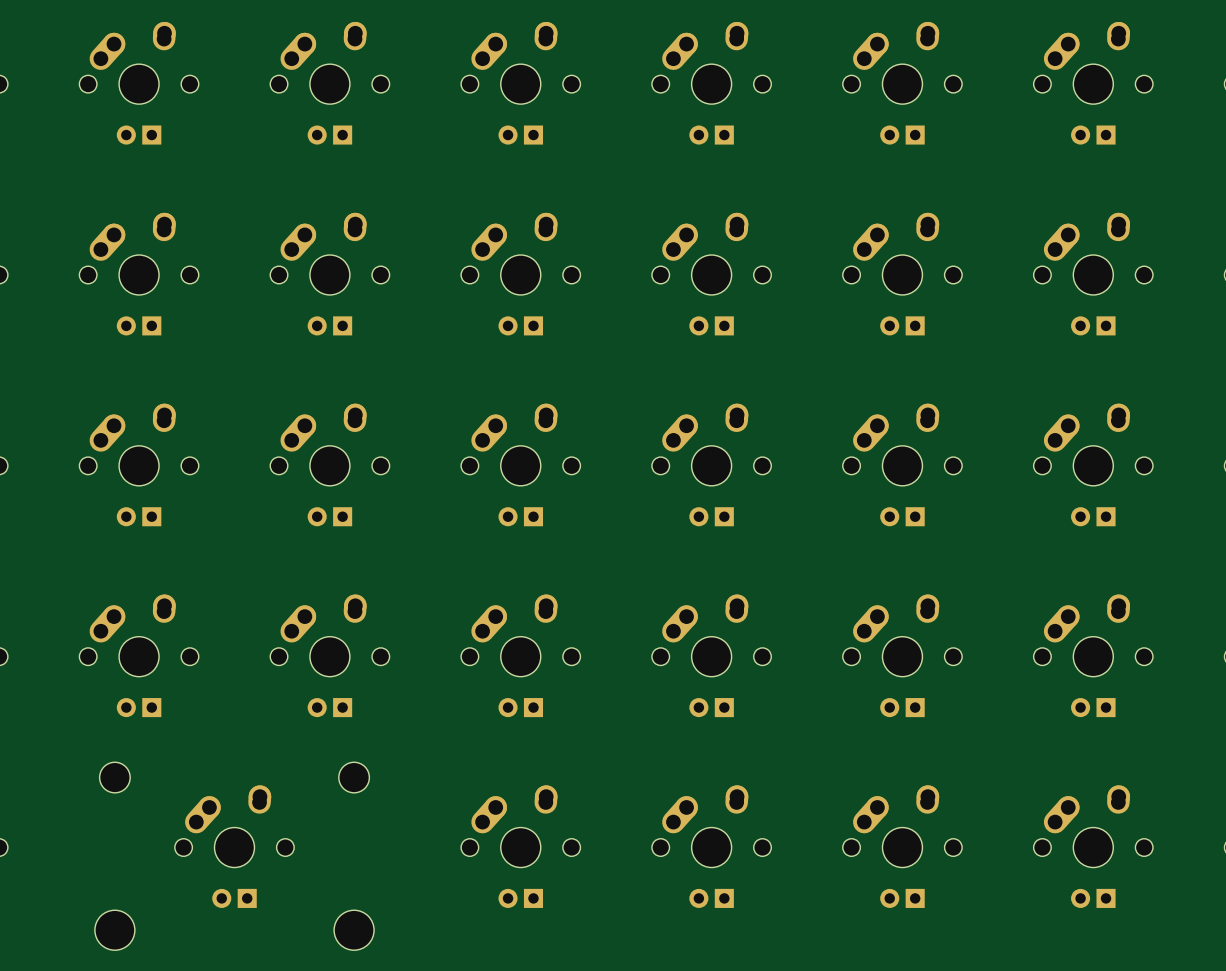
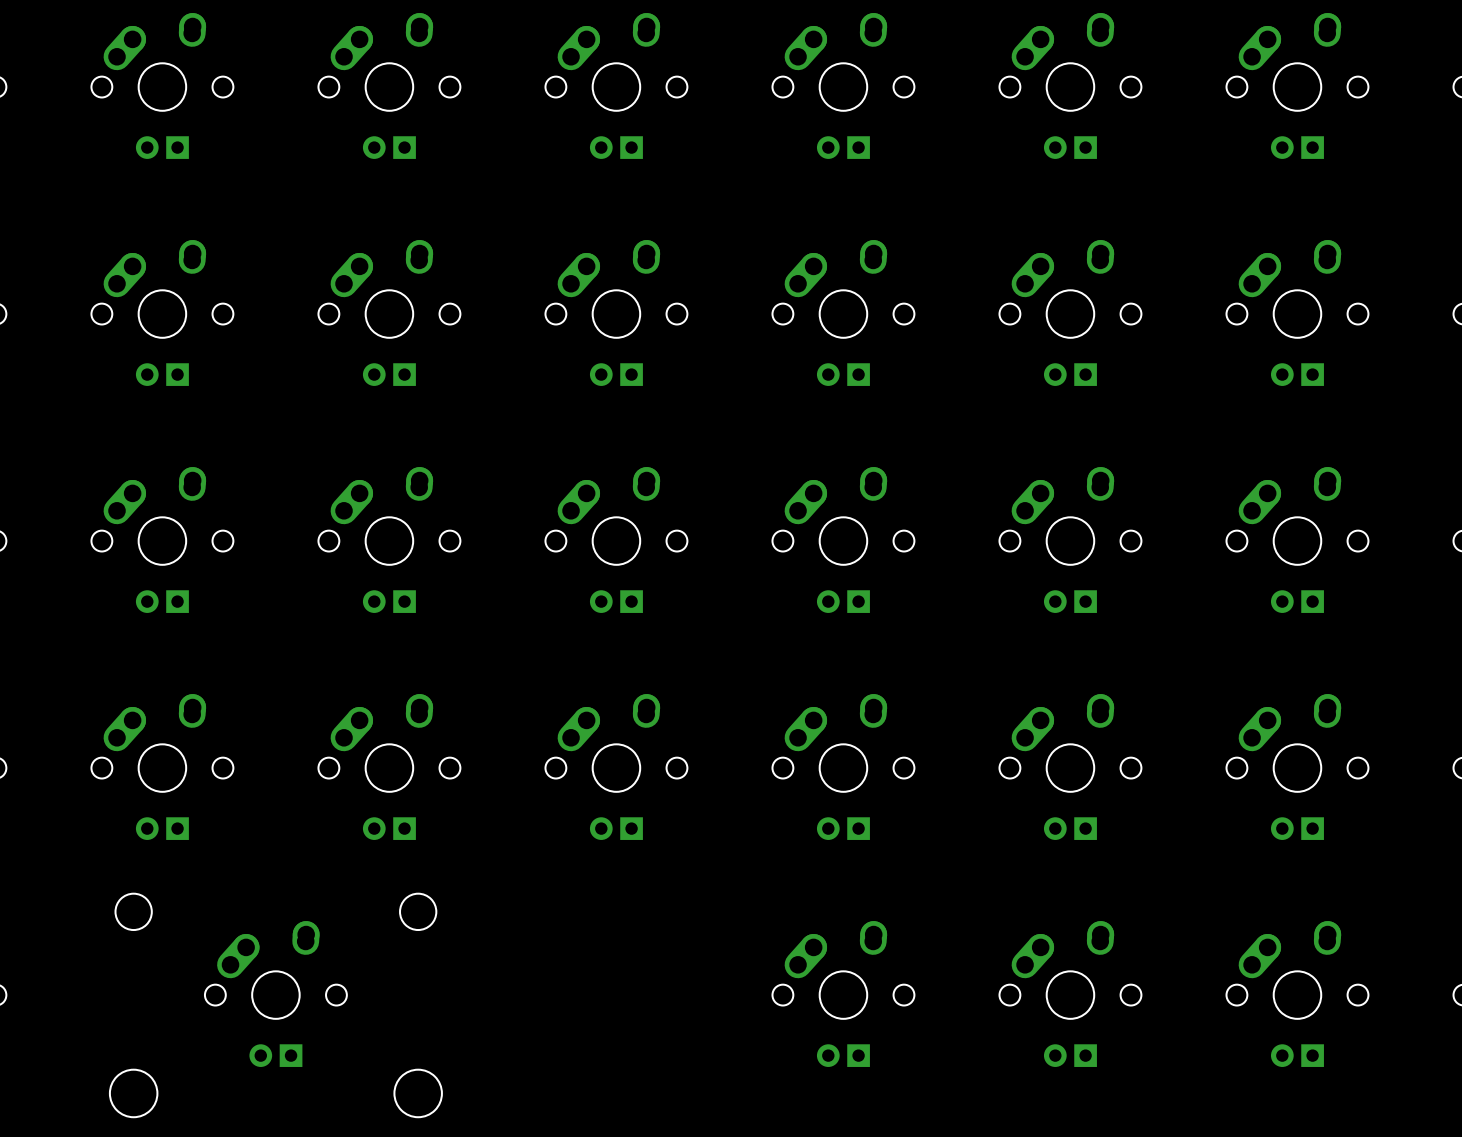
part: (520, 846) -> none

